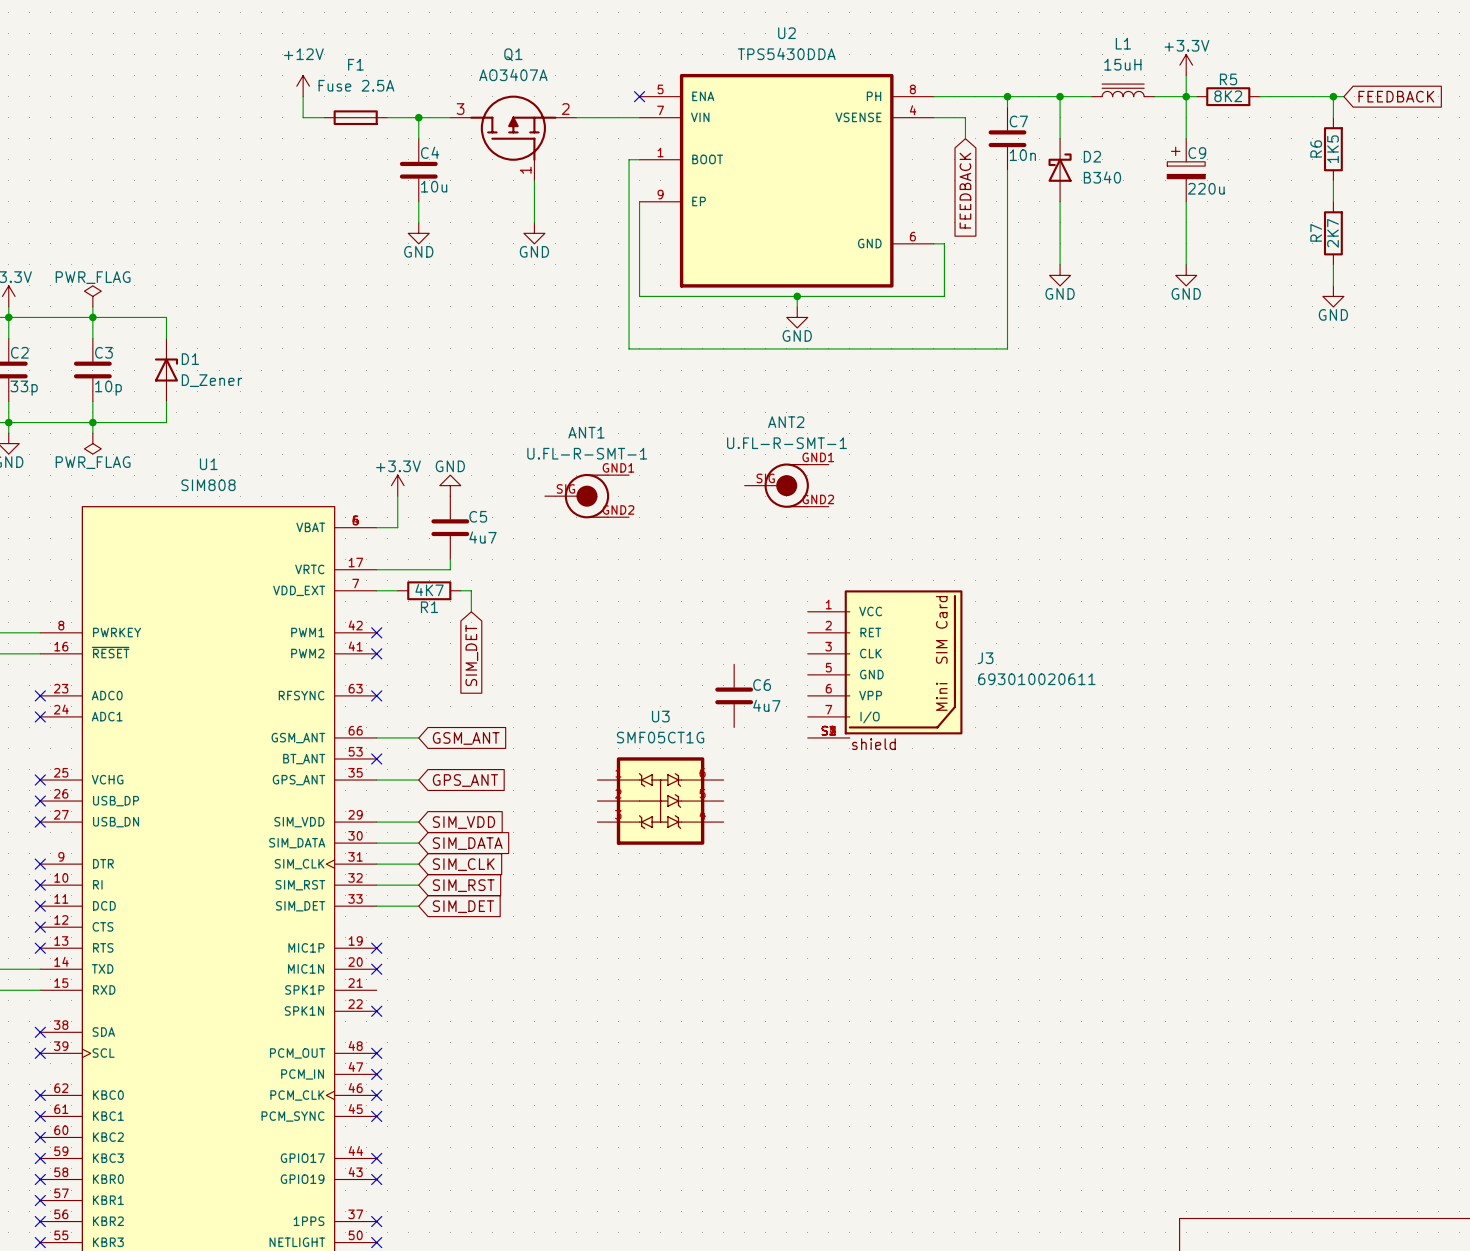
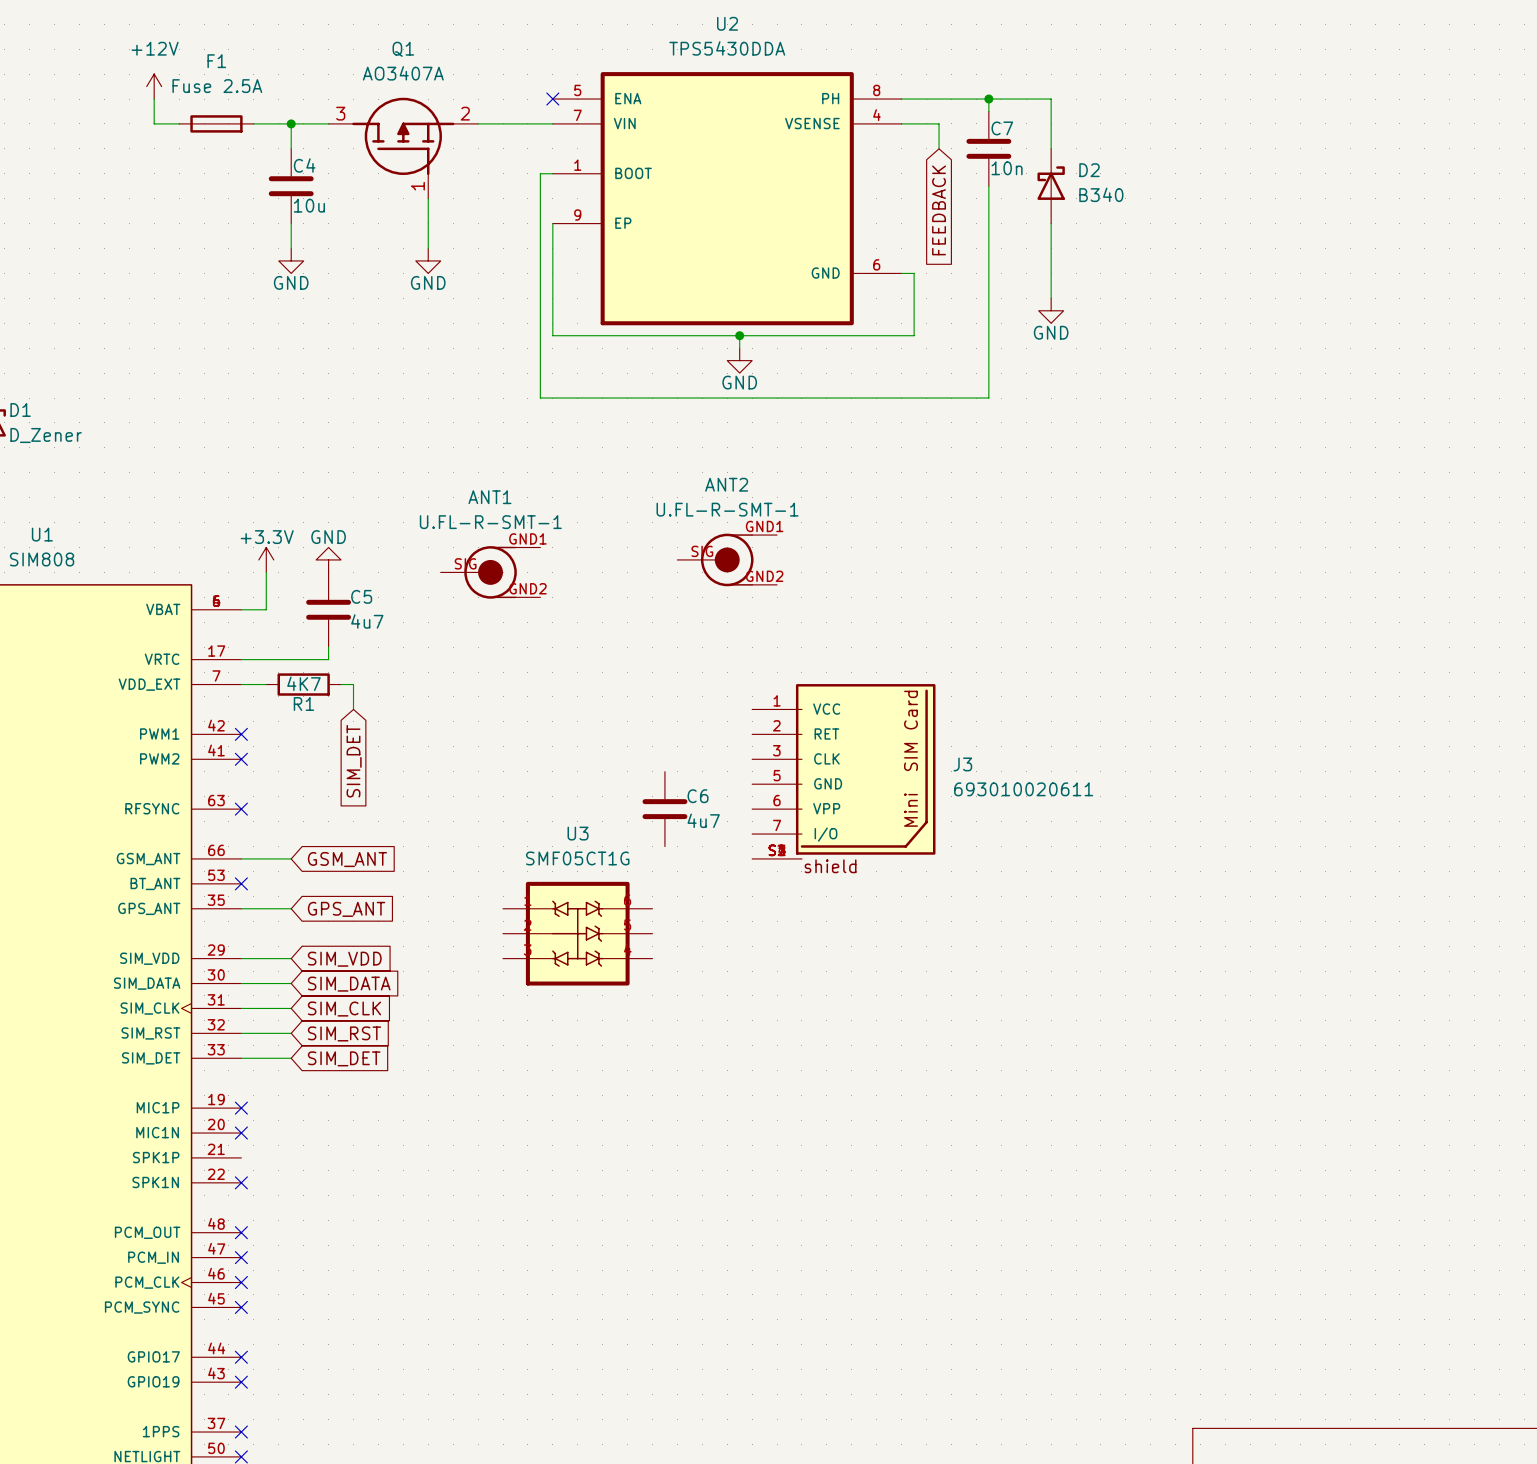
power symbol: +3.3V (1186, 65) -> none
wire: (1186, 75) (1186, 138) -> none
L1: 15uH (1123, 90) -> none
wire: (1060, 96) (1091, 96) -> none
junction: (1060, 96) -> none
wire: (1154, 96) (1196, 96) -> none
junction: (1186, 96) -> none
R5: 8K2 (1228, 96) -> none
wire: (1259, 96) (1343, 96) -> none
wire: (1333, 96) (1333, 117) -> none
junction: (1333, 96) -> none
global label: FEEDBACK (1396, 96) -> none
R6: 1K5 (1333, 149) -> none
C9: 220u (1186, 170) -> none
wire: (1333, 180) (1333, 201) -> none
wire: (1186, 201) (1186, 264) -> none
R7: 2K7 (1333, 233) -> none
wire: (1333, 264) (1333, 285) -> none
power symbol: GND (1186, 275) -> none
power symbol: GND (1333, 296) -> none

